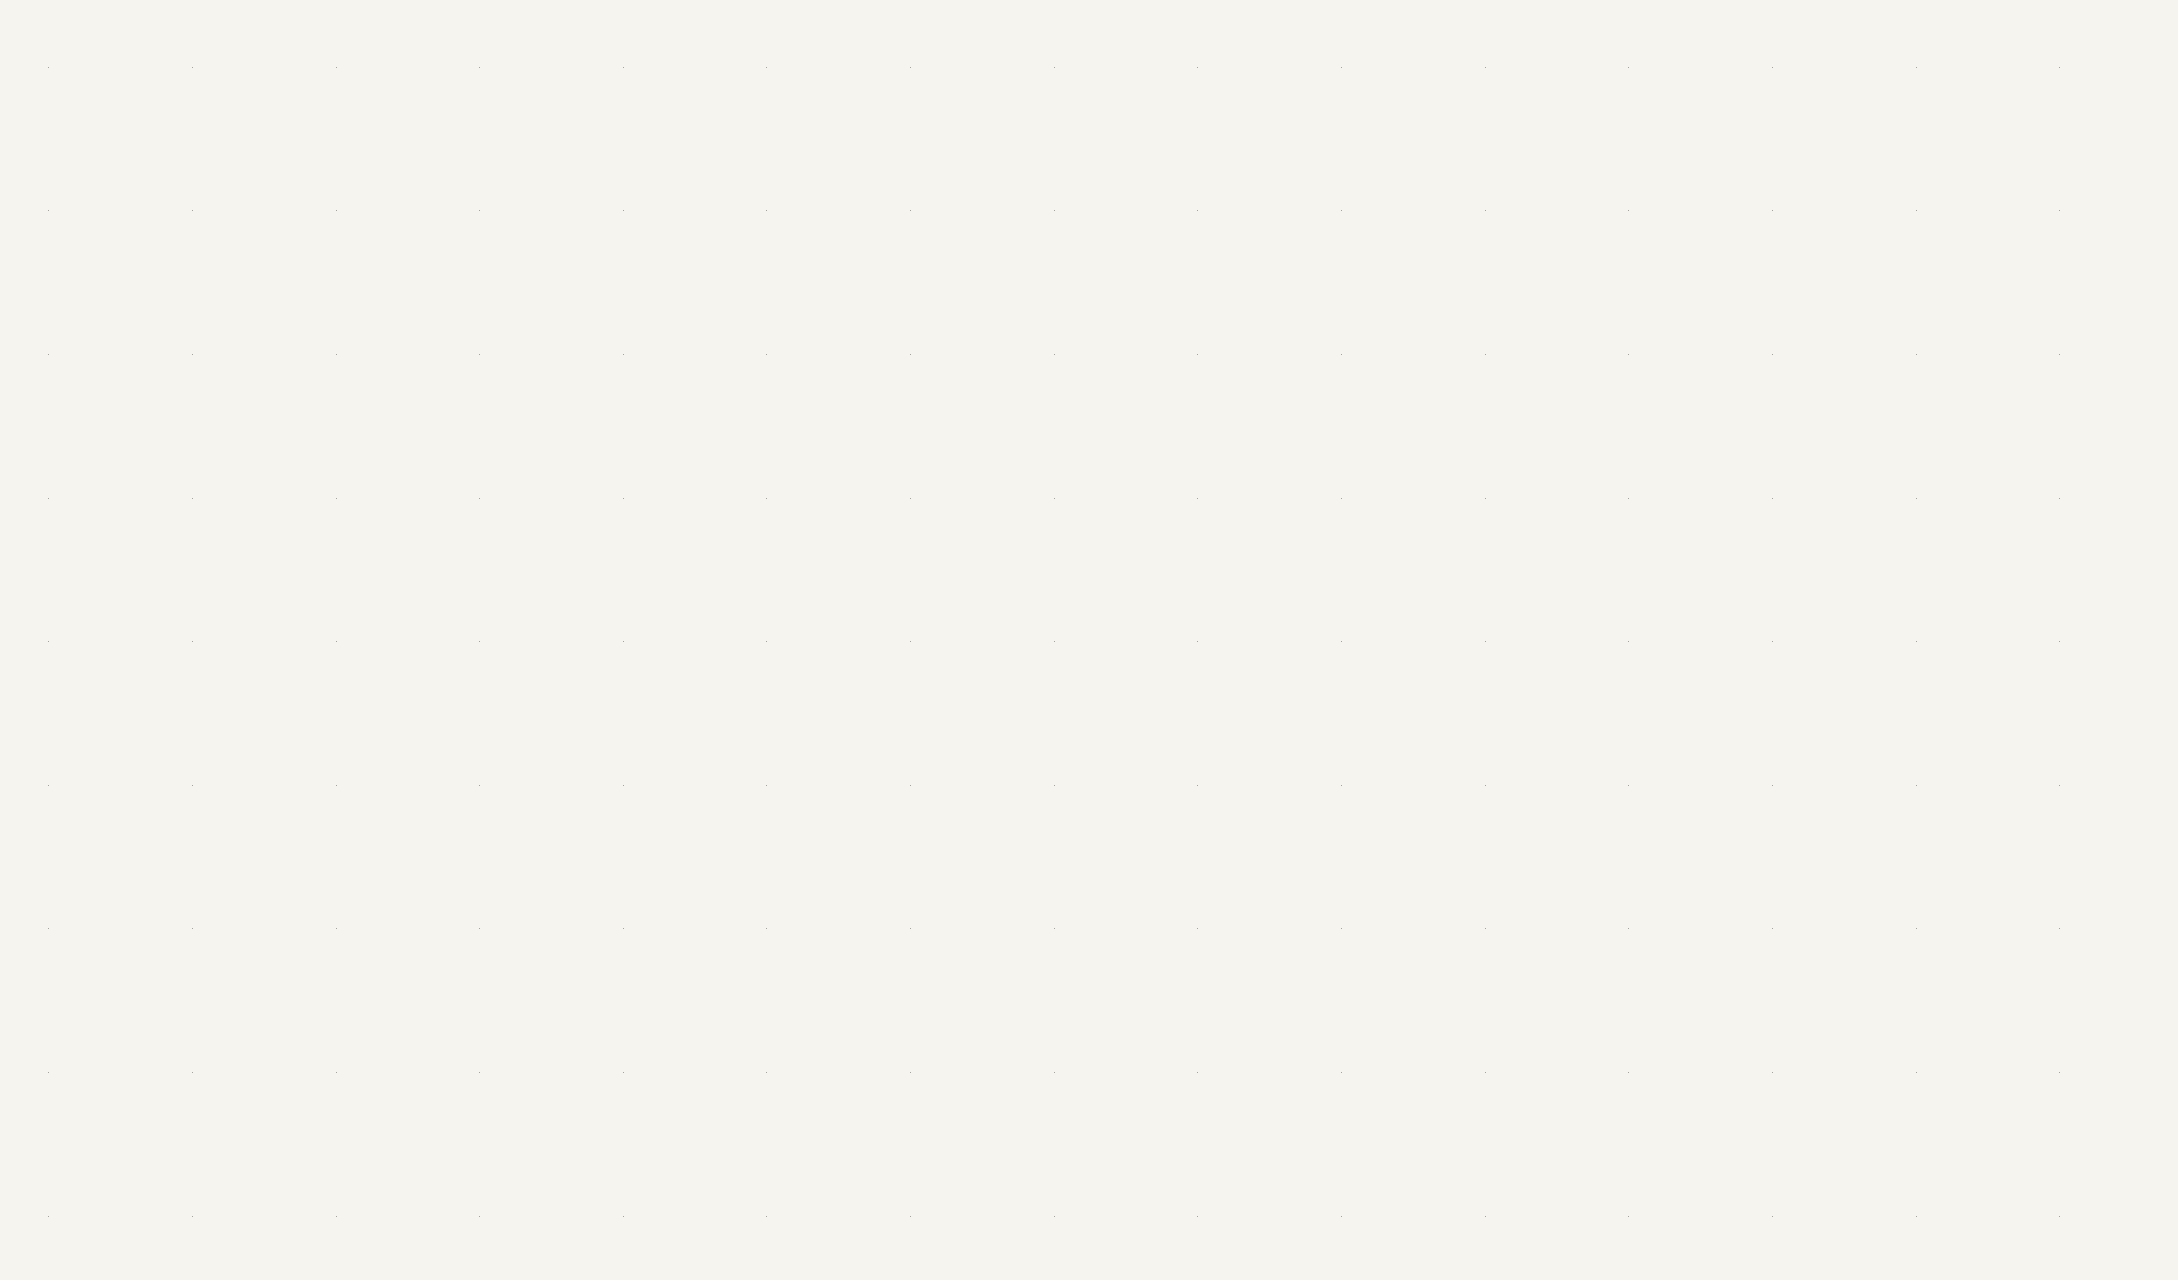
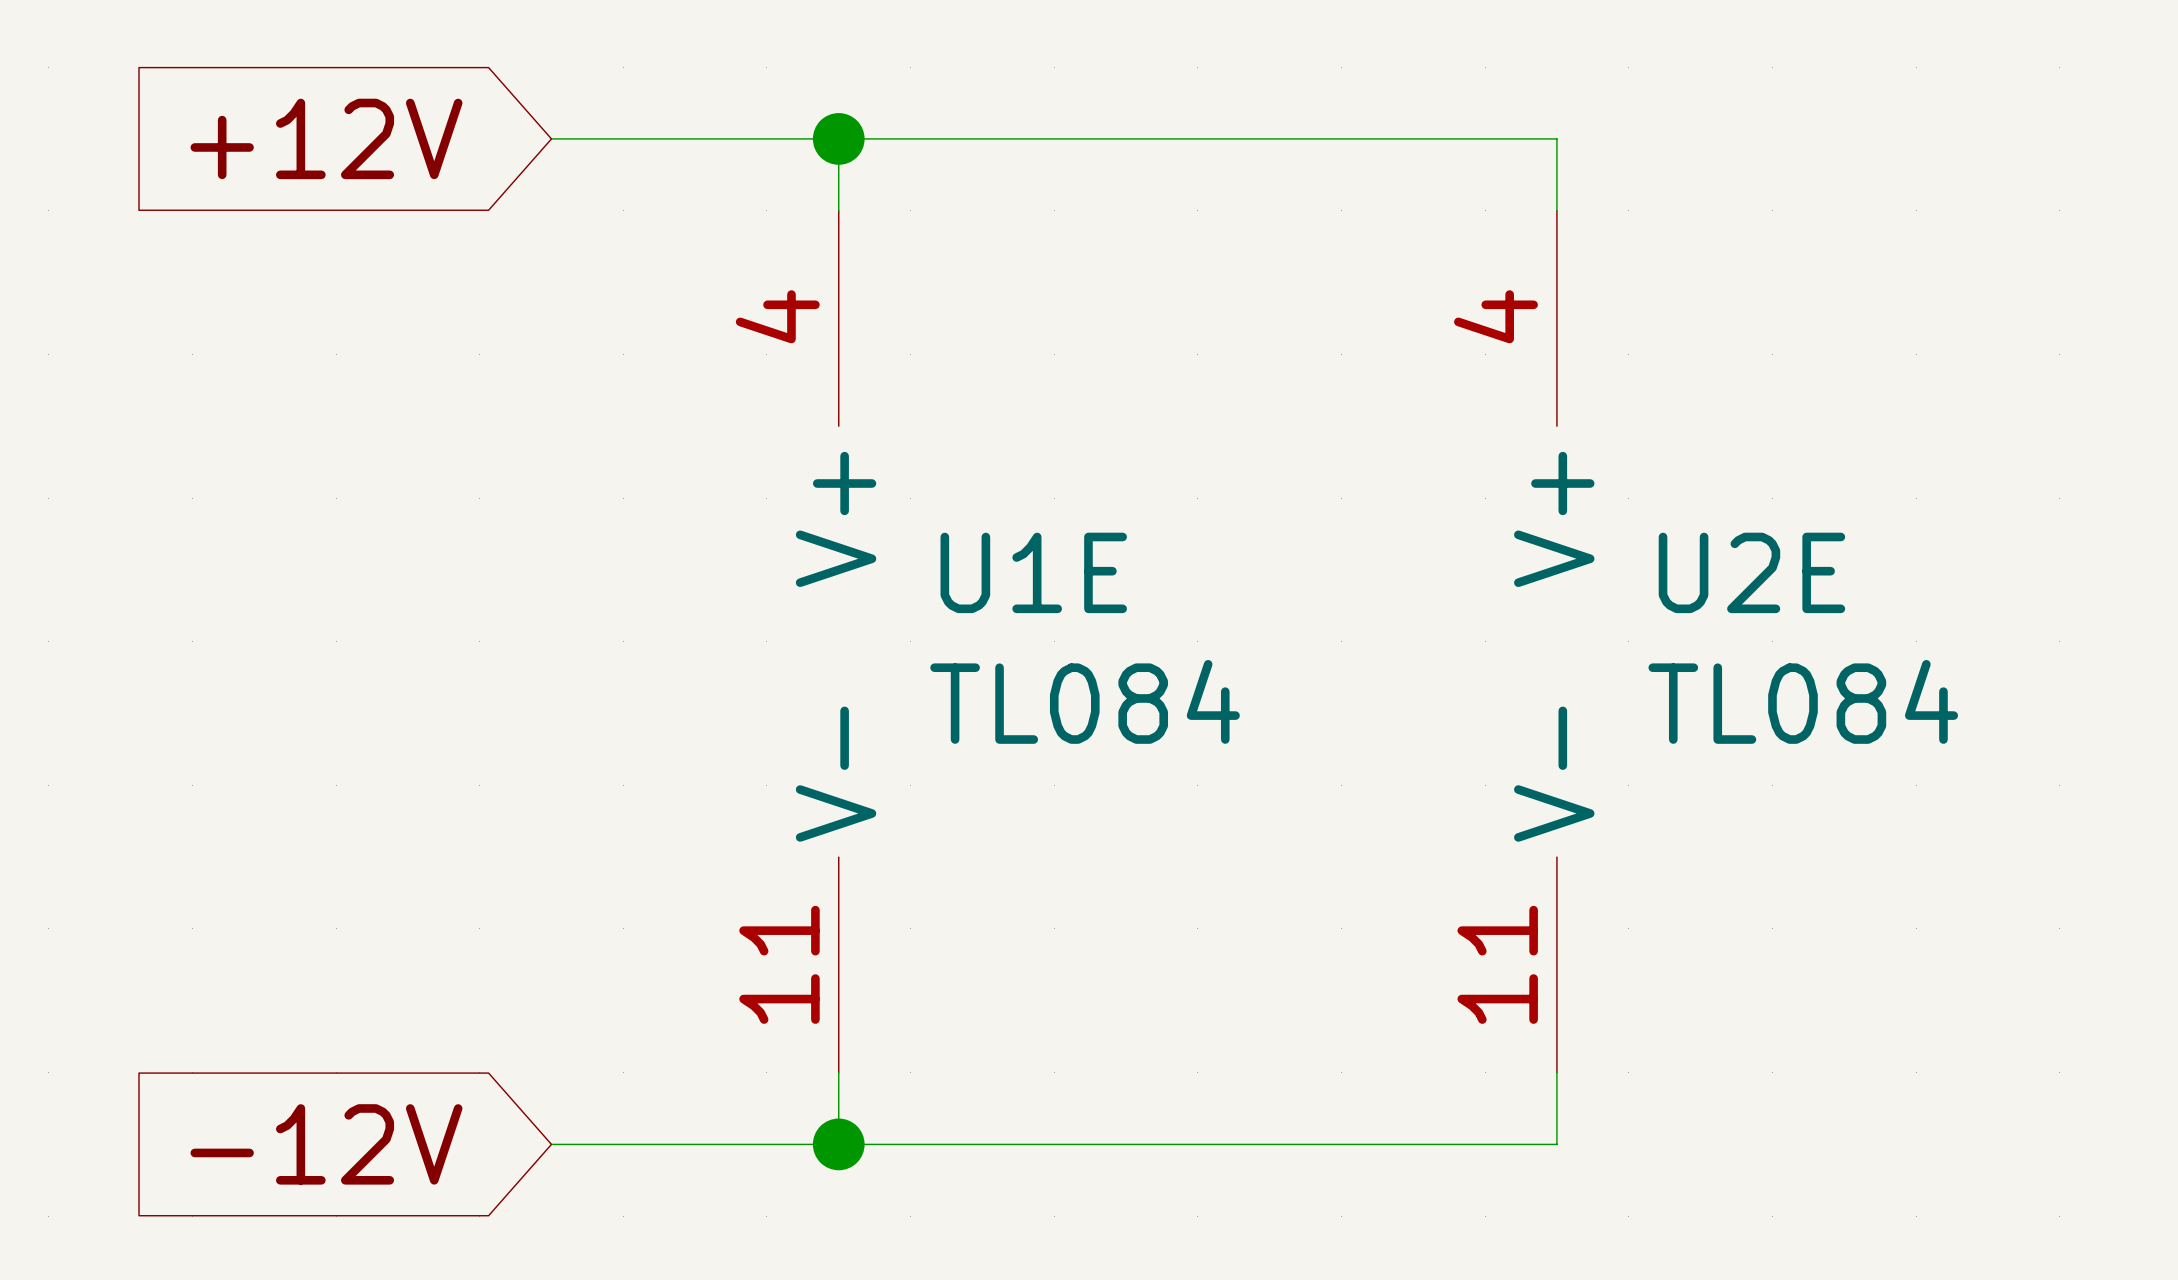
global label: none -> +12V (326, 138)
wire: none -> (551, 138) (1556, 138) (1556, 210)
wire: none -> (838, 138) (838, 210)
junction: none -> (838, 138)
U1E: none -> TL084 (838, 641)
U2E: none -> TL084 (1556, 641)
wire: none -> (838, 1072) (838, 1144)
wire: none -> (1556, 1072) (1556, 1144) (551, 1144)
global label: none -> -12V (326, 1144)
junction: none -> (838, 1144)

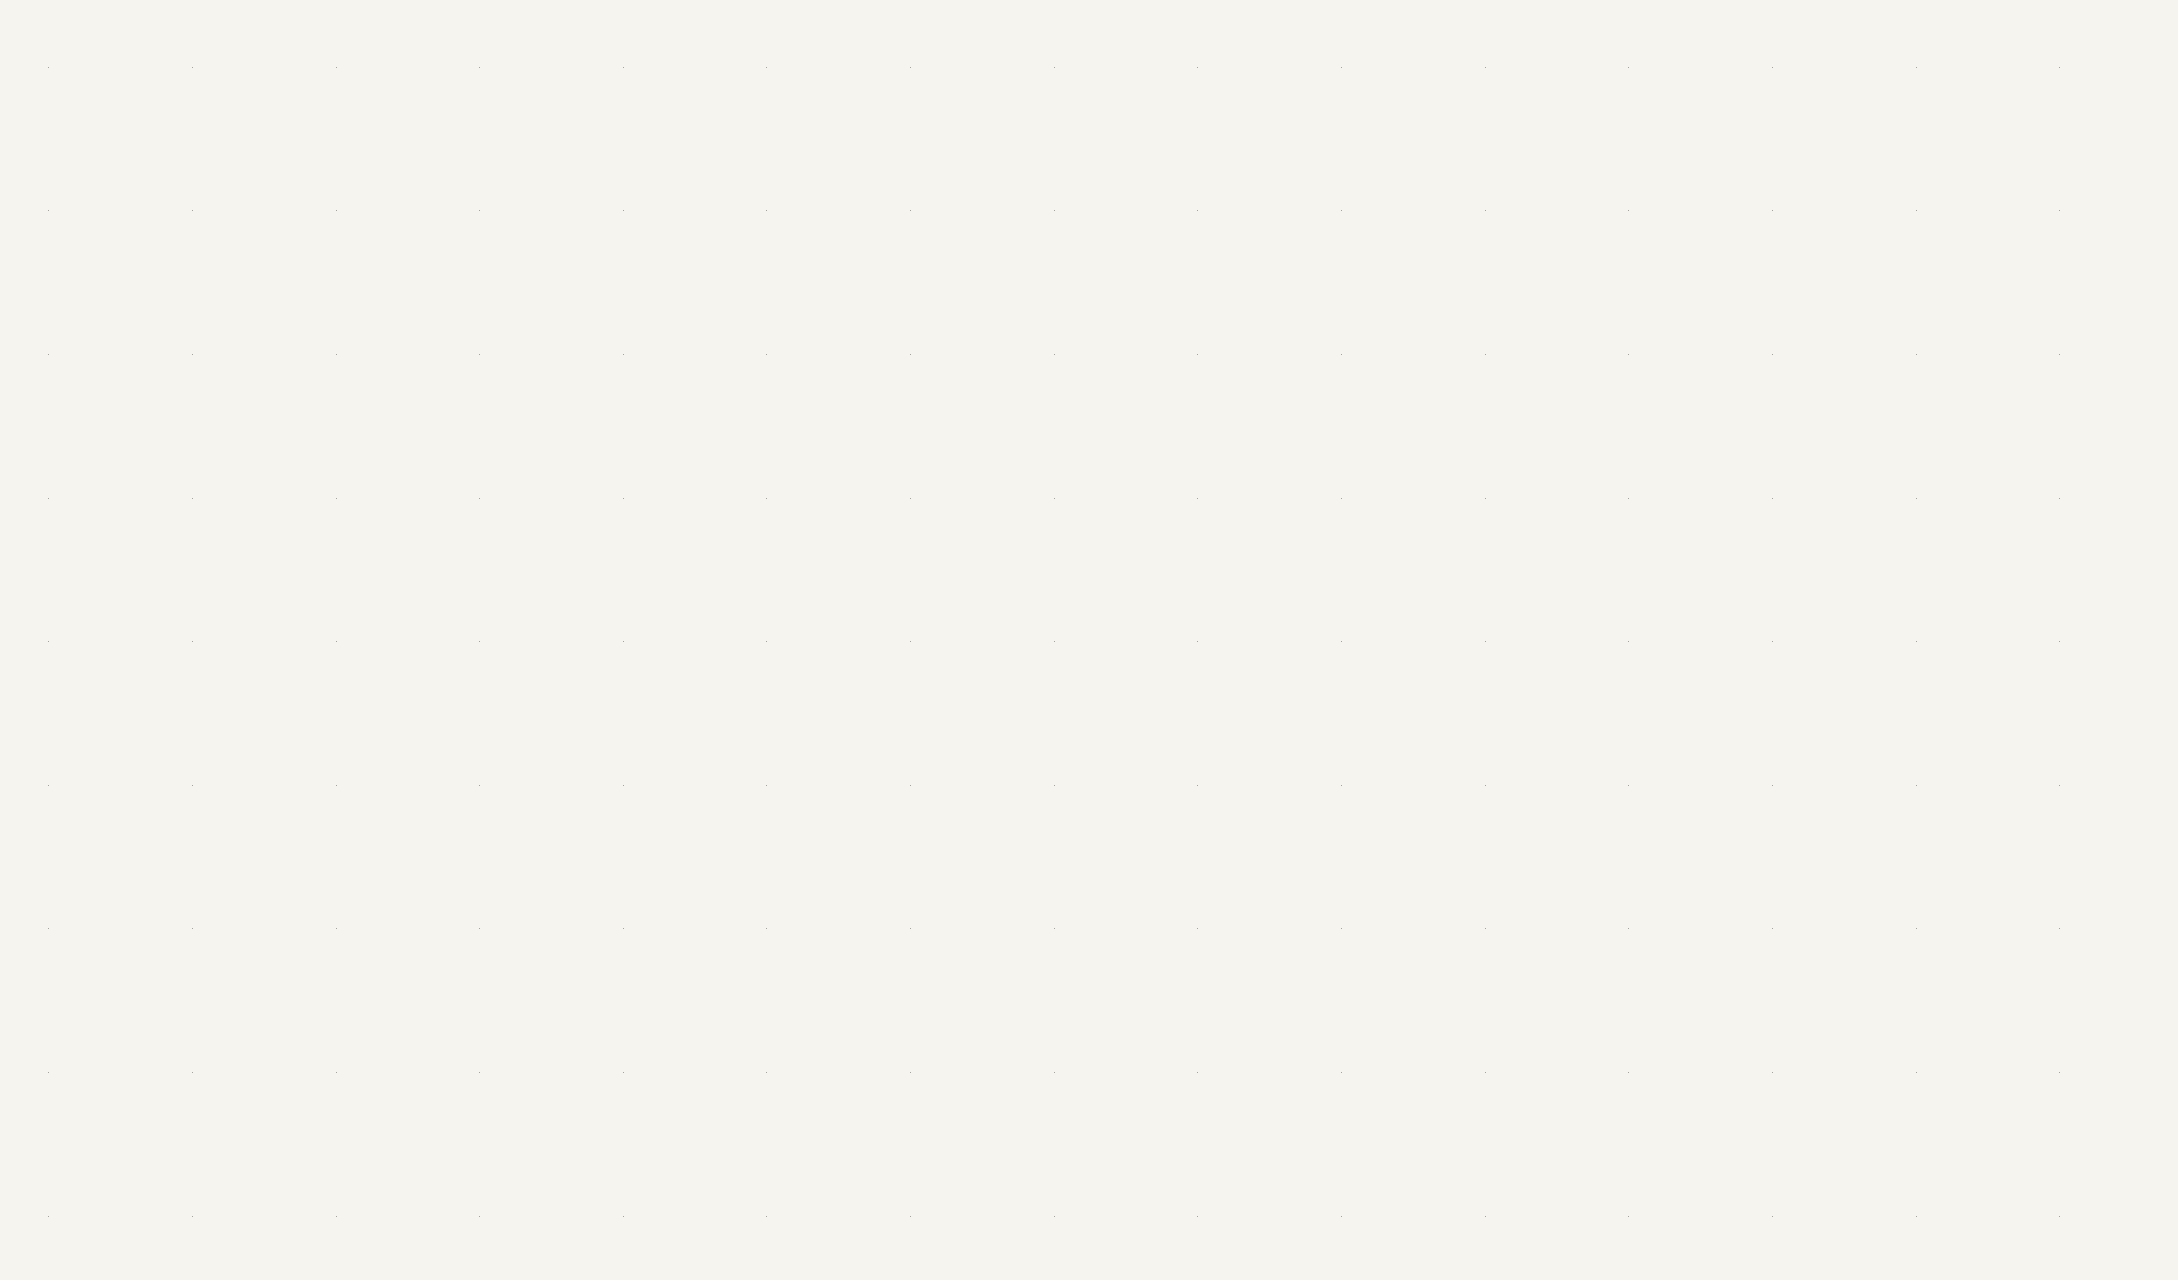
global label: +12V (326, 138) -> none
wire: (551, 138) (1556, 138) (1556, 210) -> none
wire: (838, 138) (838, 210) -> none
junction: (838, 138) -> none
U1E: TL084 (838, 641) -> none
U2E: TL084 (1556, 641) -> none
wire: (838, 1072) (838, 1144) -> none
wire: (1556, 1072) (1556, 1144) (551, 1144) -> none
global label: -12V (326, 1144) -> none
junction: (838, 1144) -> none

